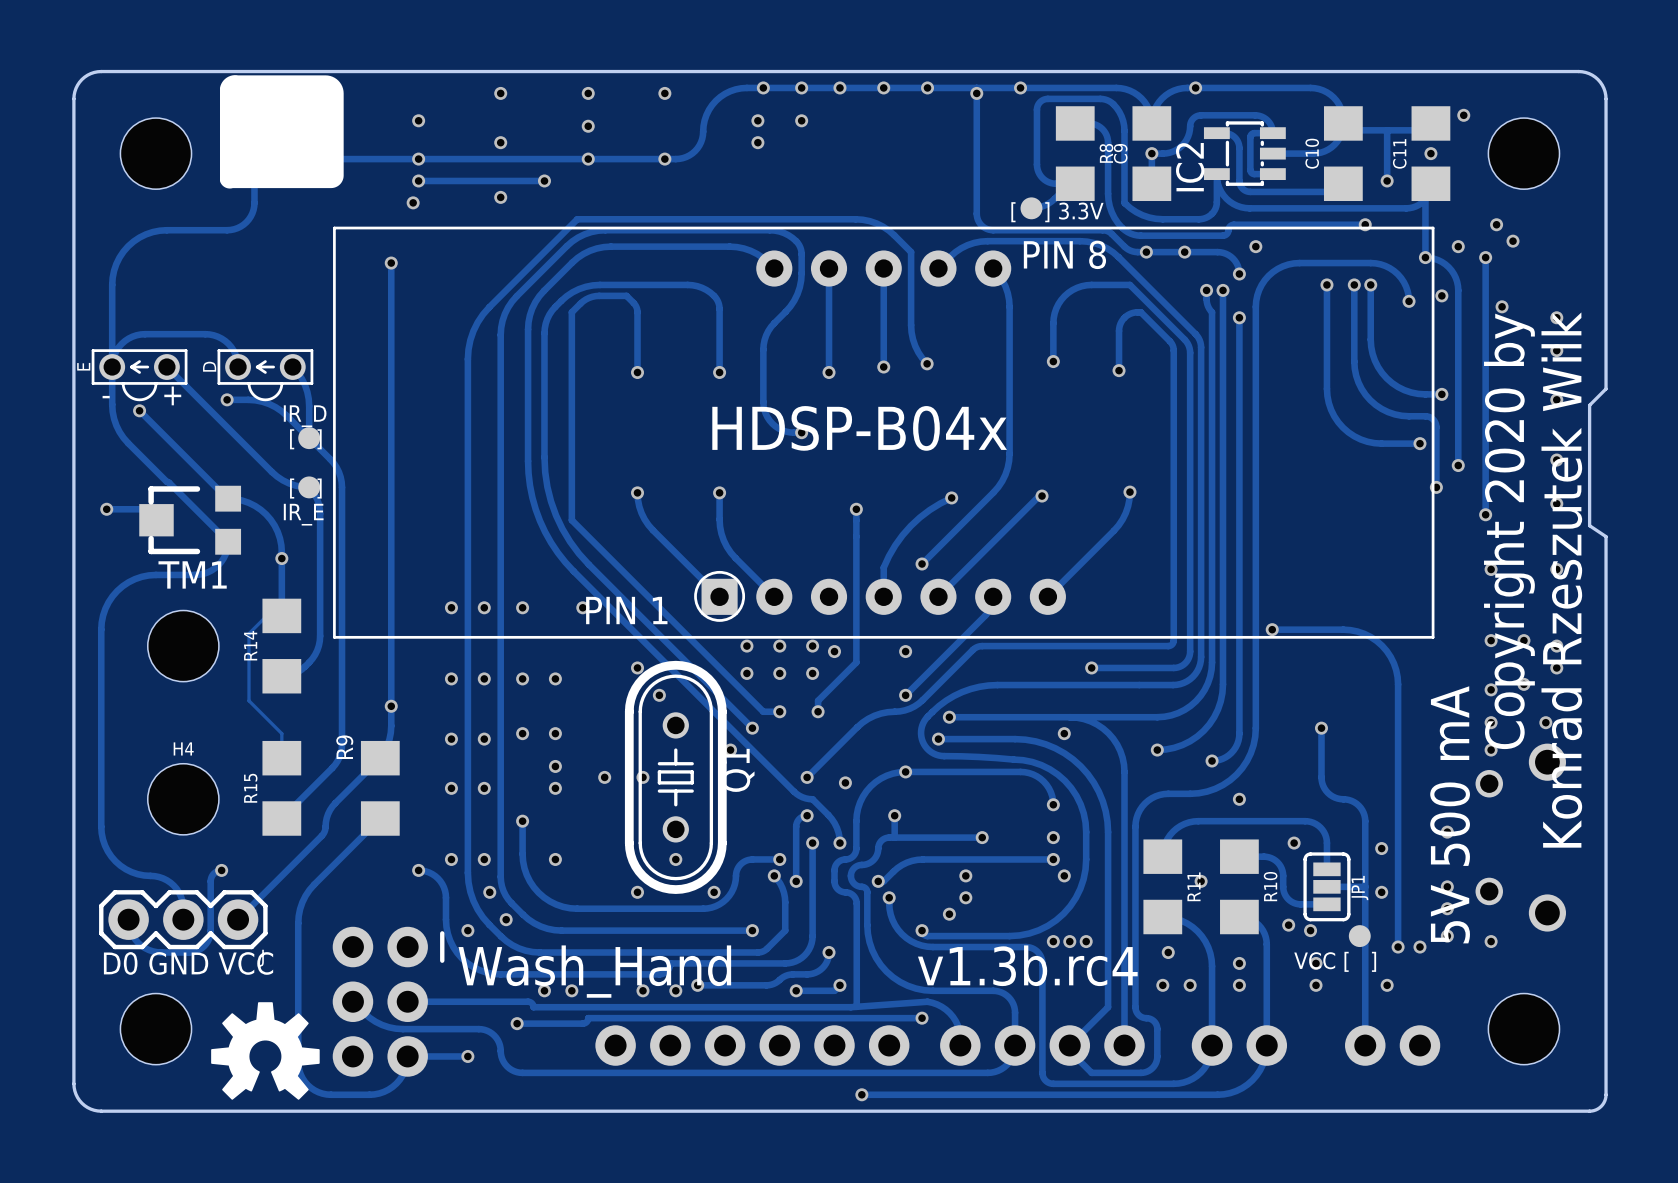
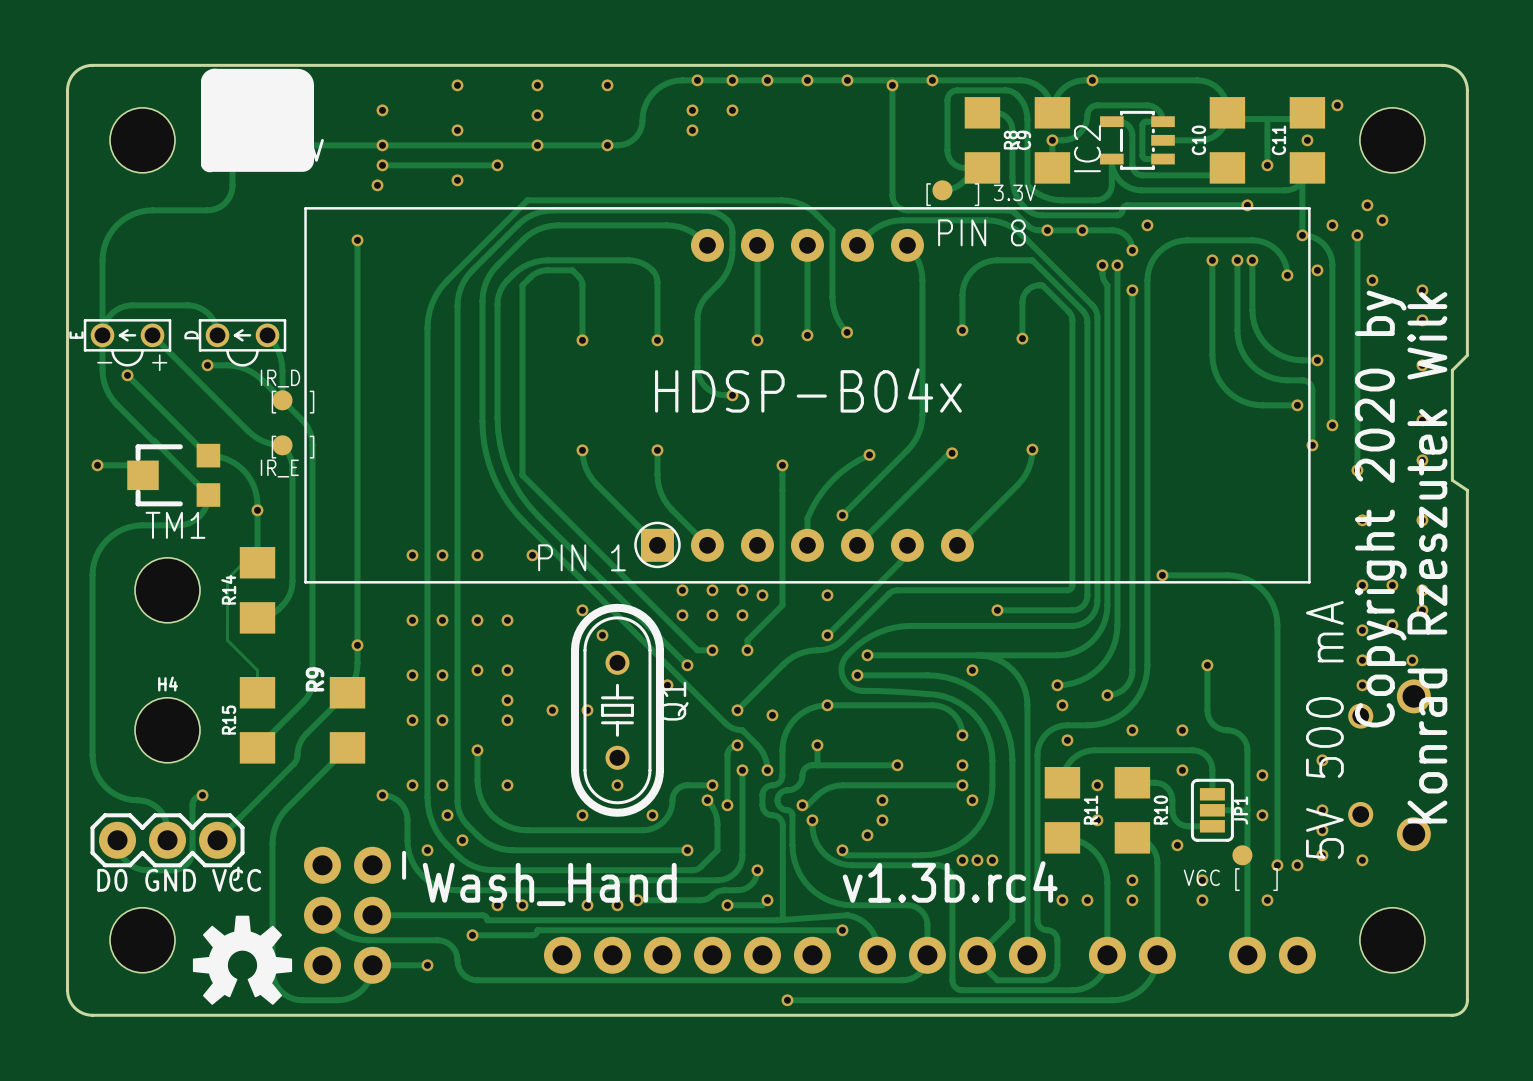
via: none -> (1062, 705)
via: none -> (1182, 730)
via: none -> (1067, 740)
via: none -> (1097, 785)
via: (1201, 881) -> none
via: none -> (1097, 820)
via: (1310, 930) -> none
via: (1168, 952) -> none

